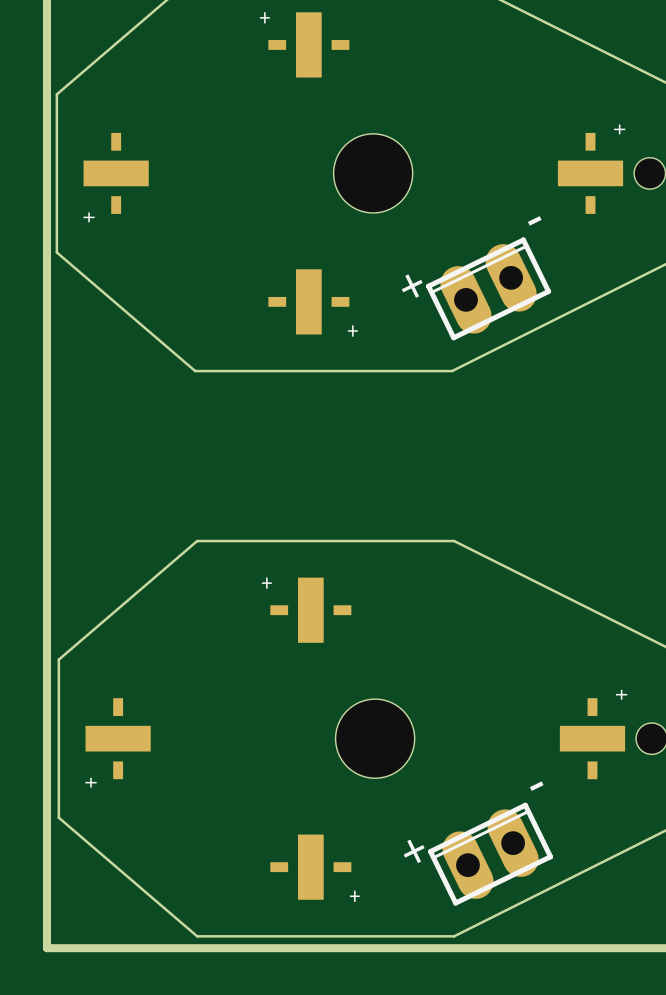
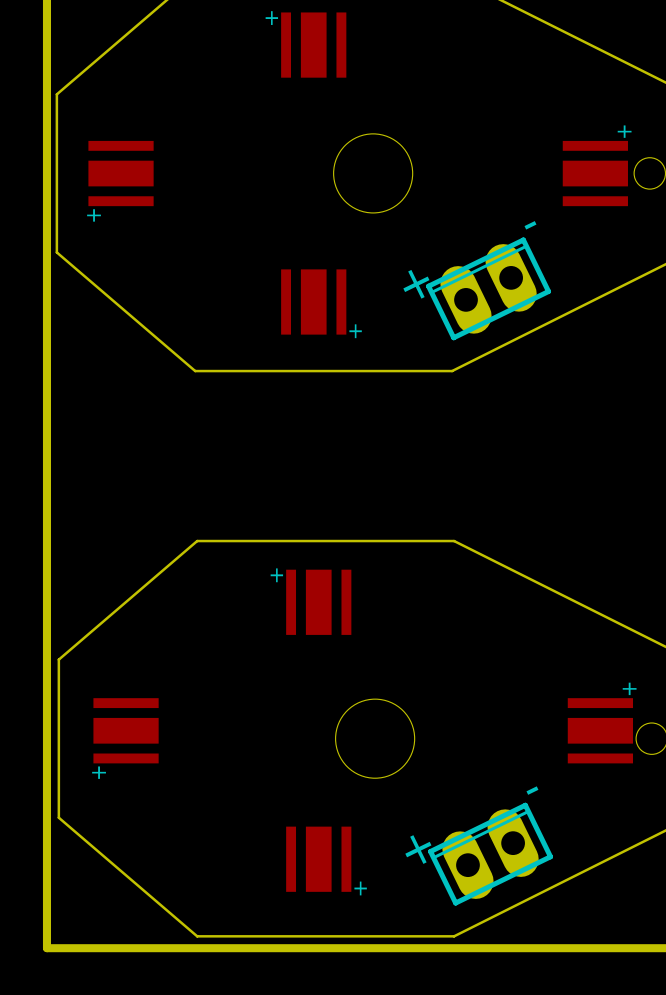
part footprint: [268, 12, 350, 78] -> [281, 12, 347, 78]
part footprint: [83, 132, 149, 214] -> [88, 140, 154, 207]
part footprint: [557, 132, 624, 214] -> [562, 140, 628, 207]
part footprint: [268, 269, 350, 335] -> [281, 269, 347, 335]
part footprint: [270, 577, 352, 643] -> [286, 569, 352, 635]
part footprint: [85, 698, 151, 780] -> [93, 698, 159, 764]
part footprint: [559, 698, 626, 780] -> [567, 698, 634, 764]
part footprint: [270, 834, 352, 900] -> [286, 826, 352, 892]

